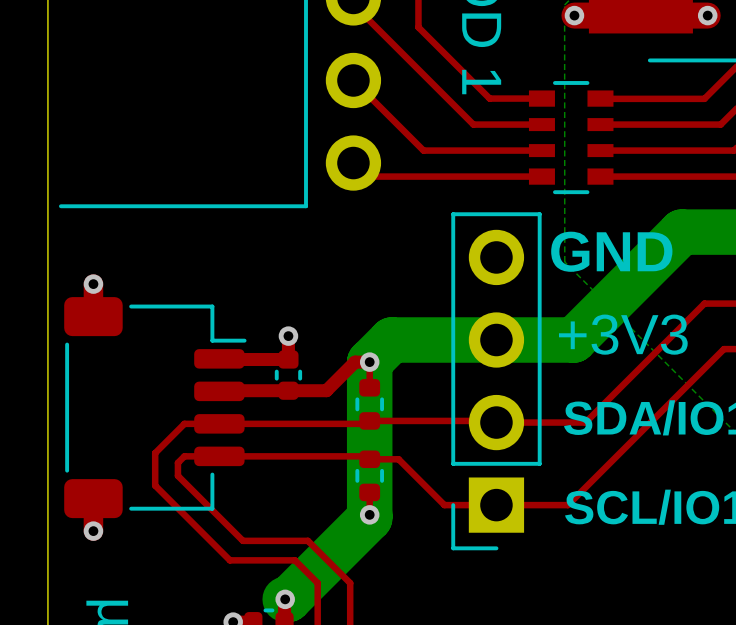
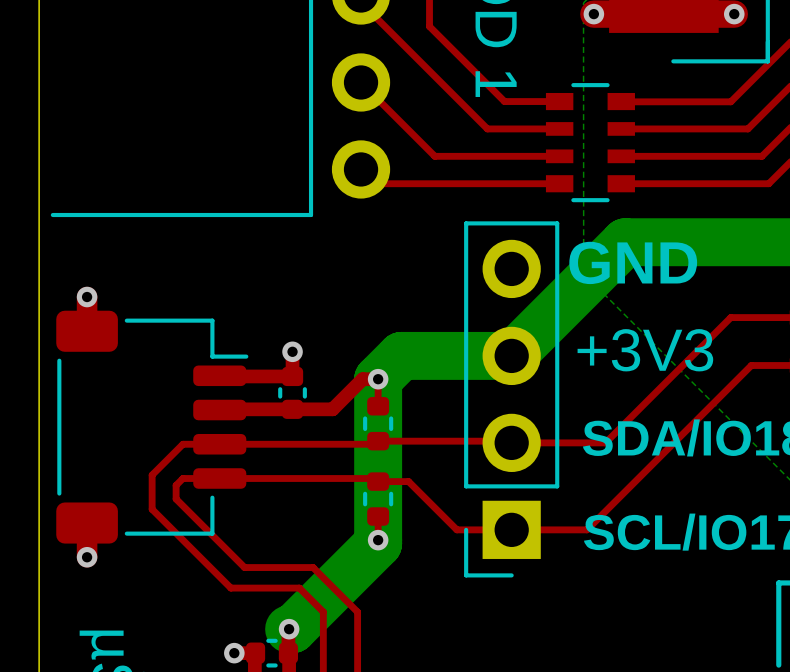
bottom track: (681, 232) (573, 340) (496, 340) -> (706, 242) (625, 242) (511, 355)

